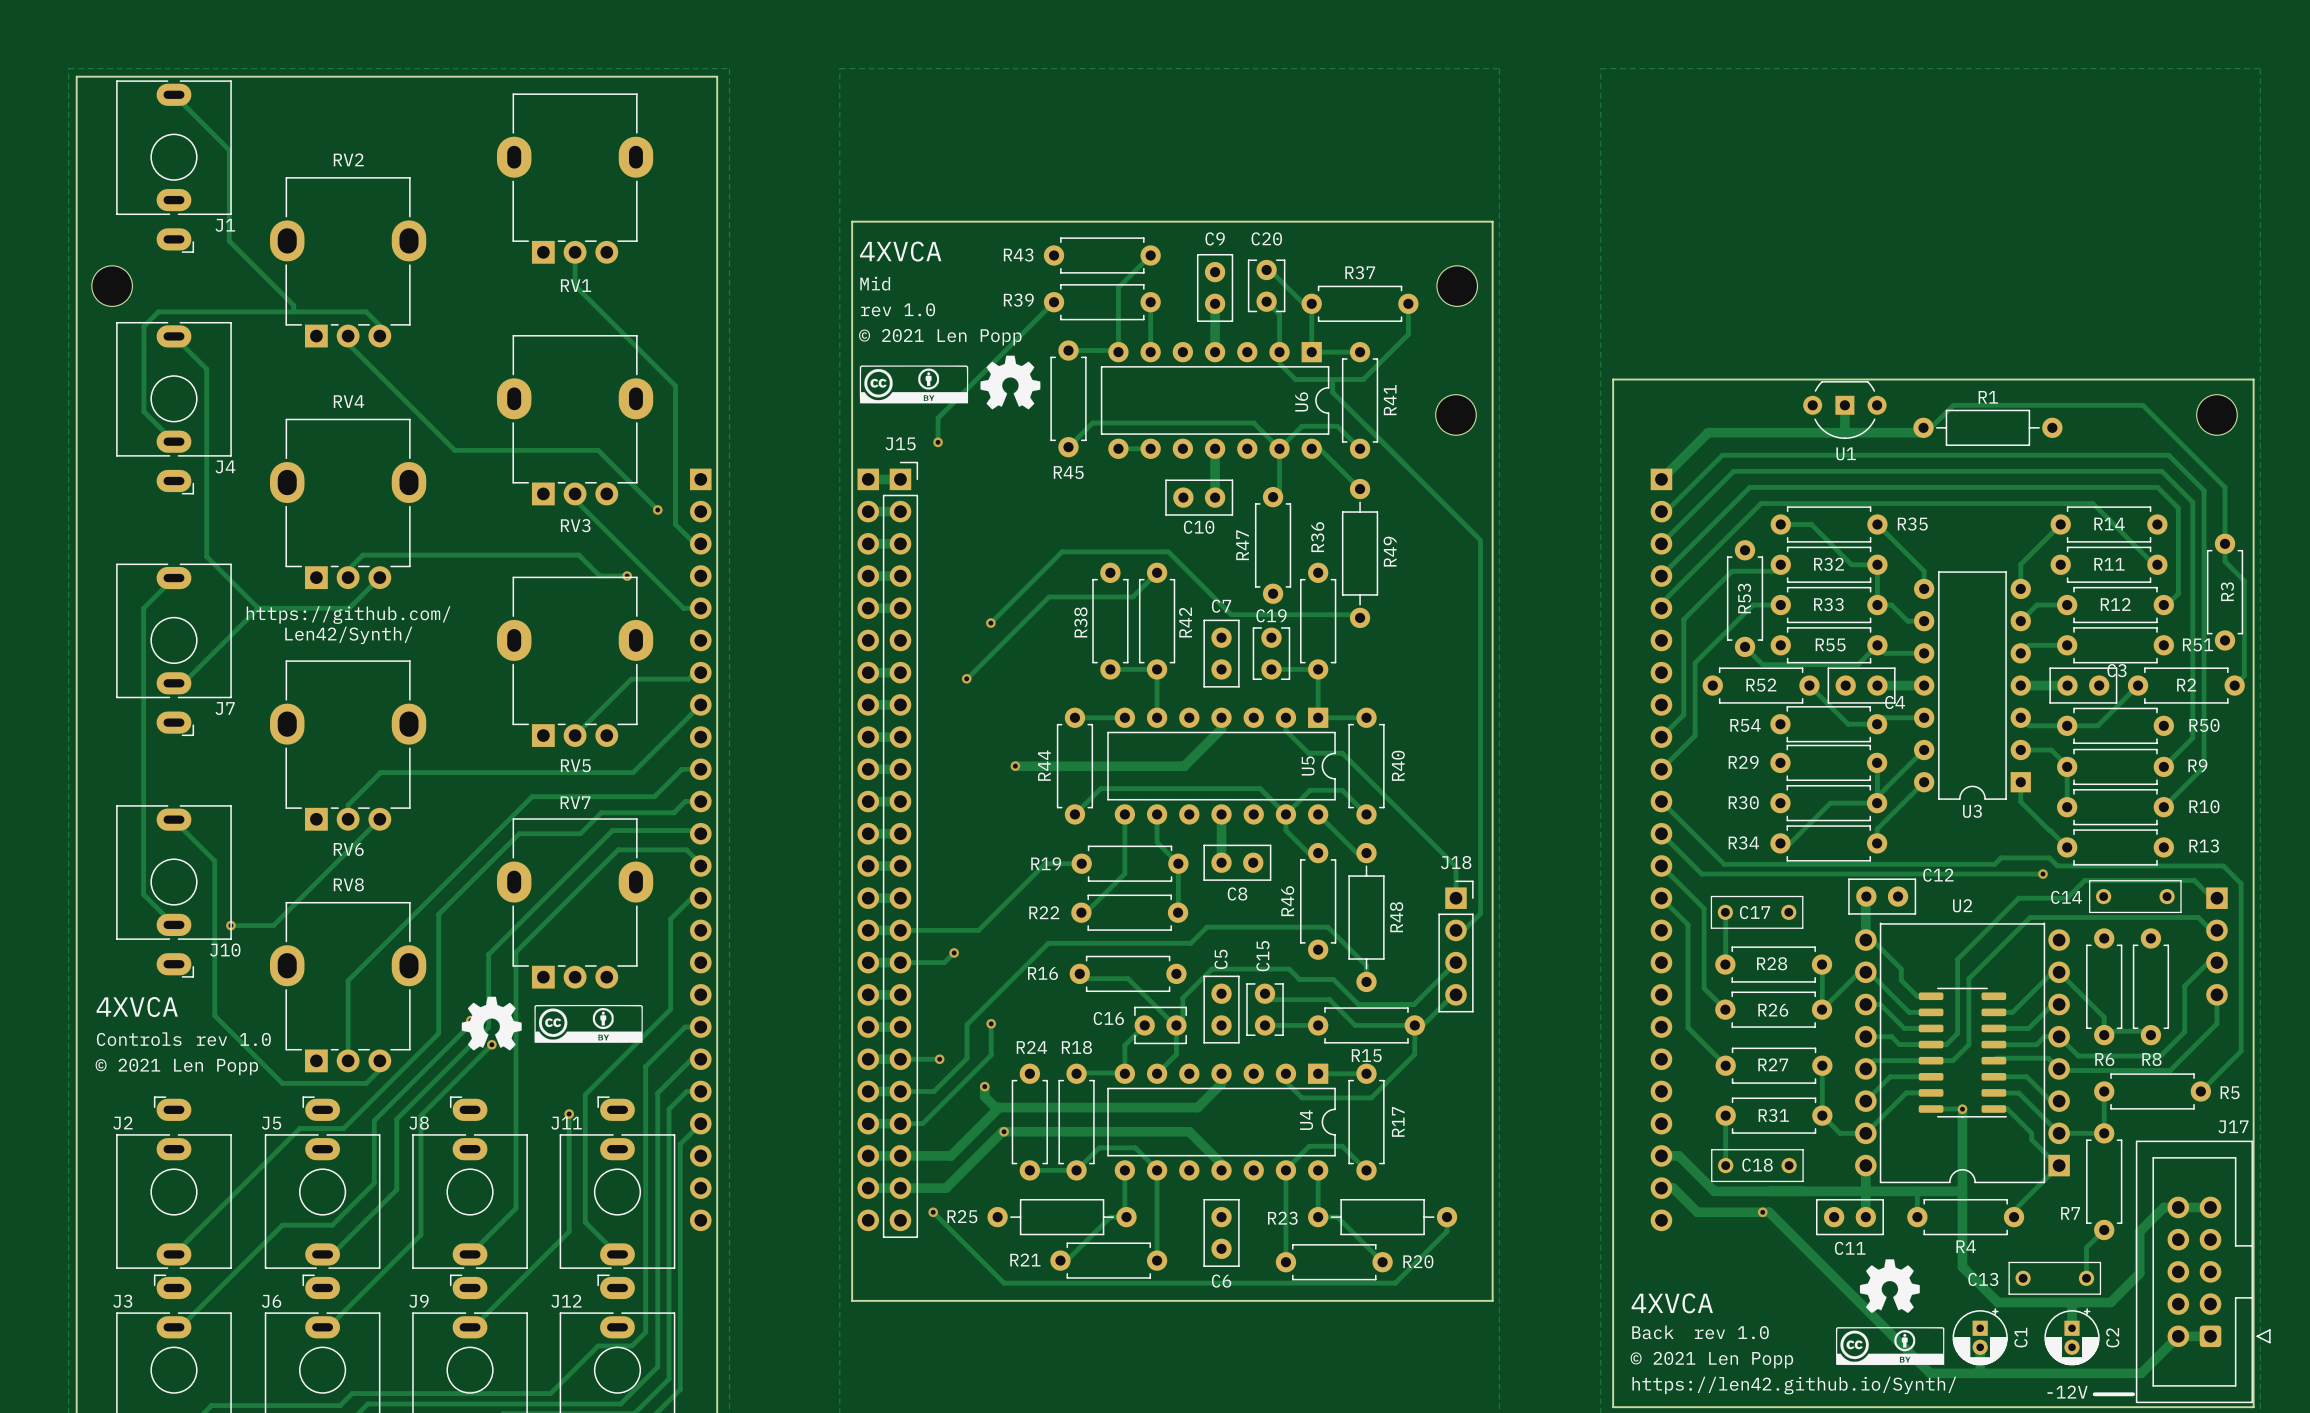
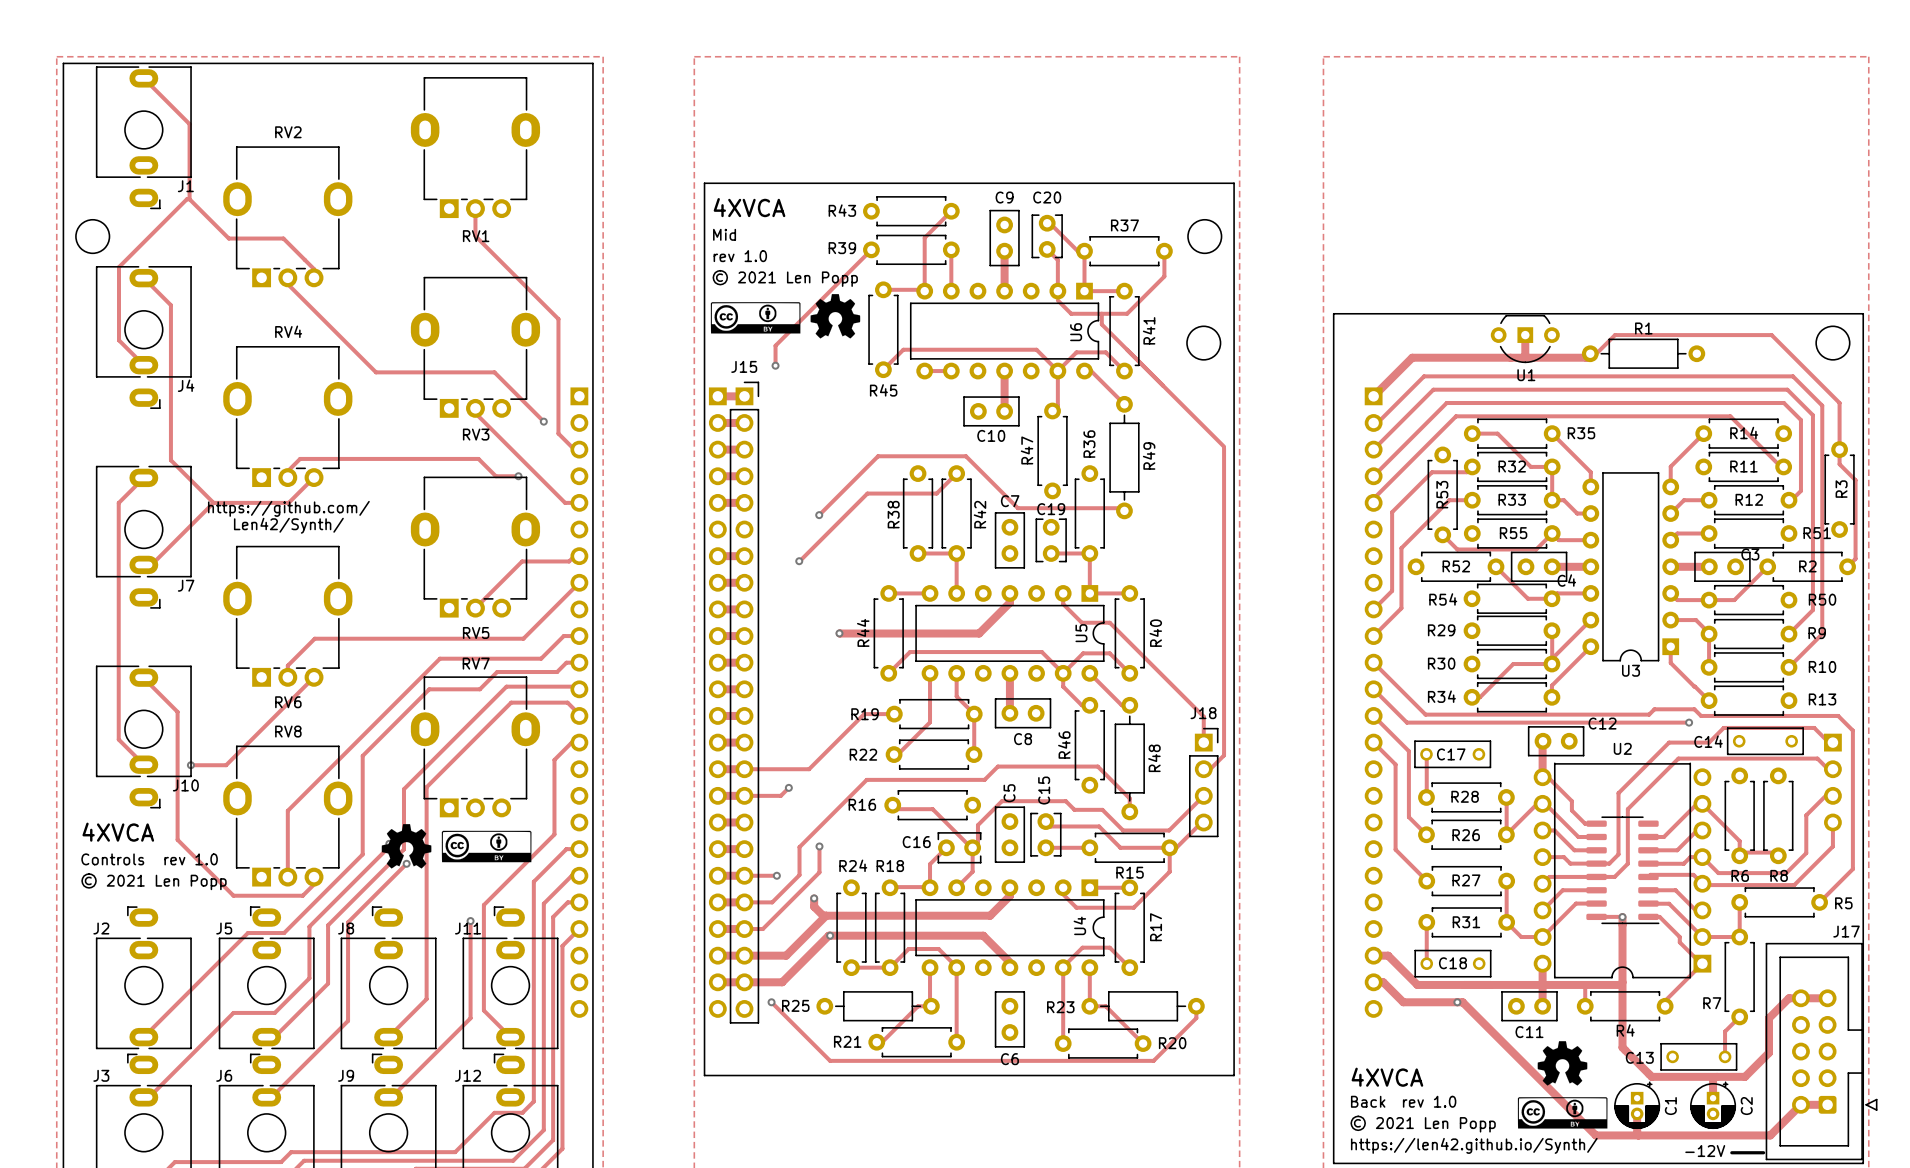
track: (276, 288) (293, 305) (293, 311) -> (228, 238) (283, 238) (302, 257)
track: (366, 311) (158, 311) (143, 326) -> (189, 199) (186, 199) (119, 267) (119, 269)

